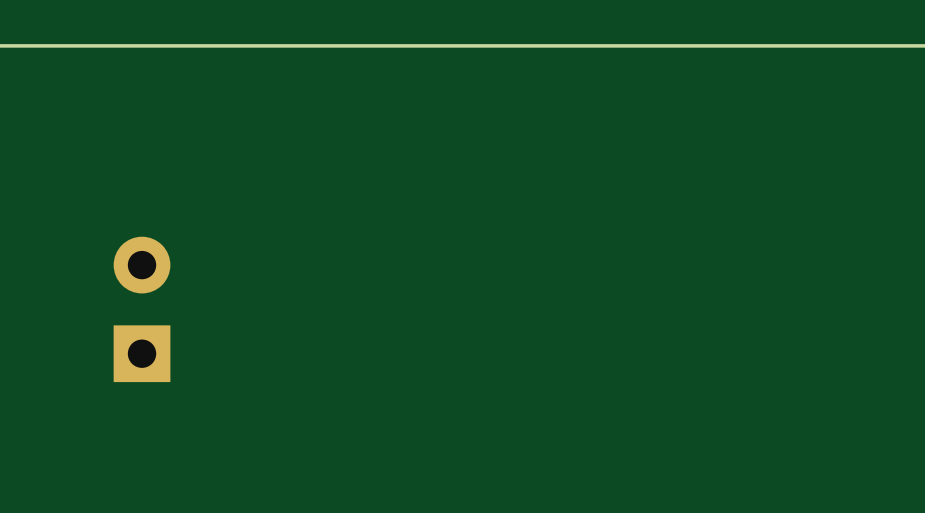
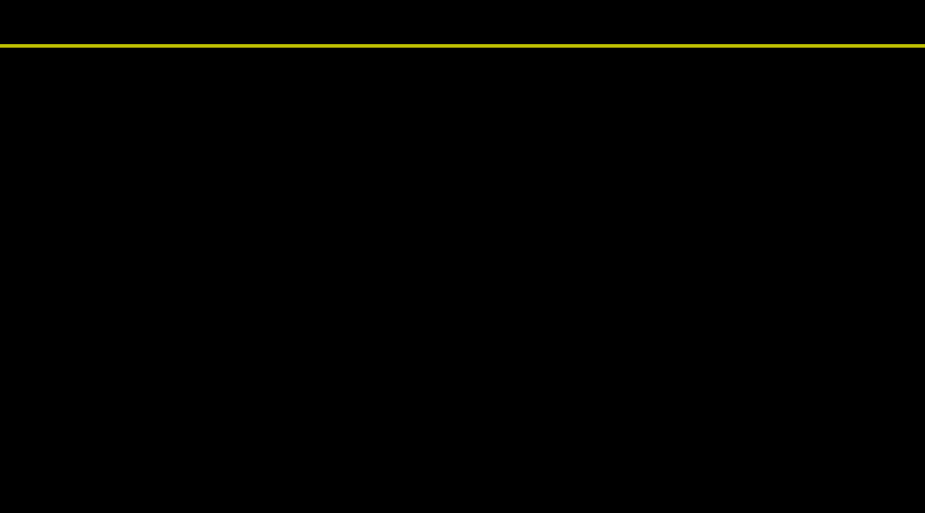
part: (142, 309) -> none

